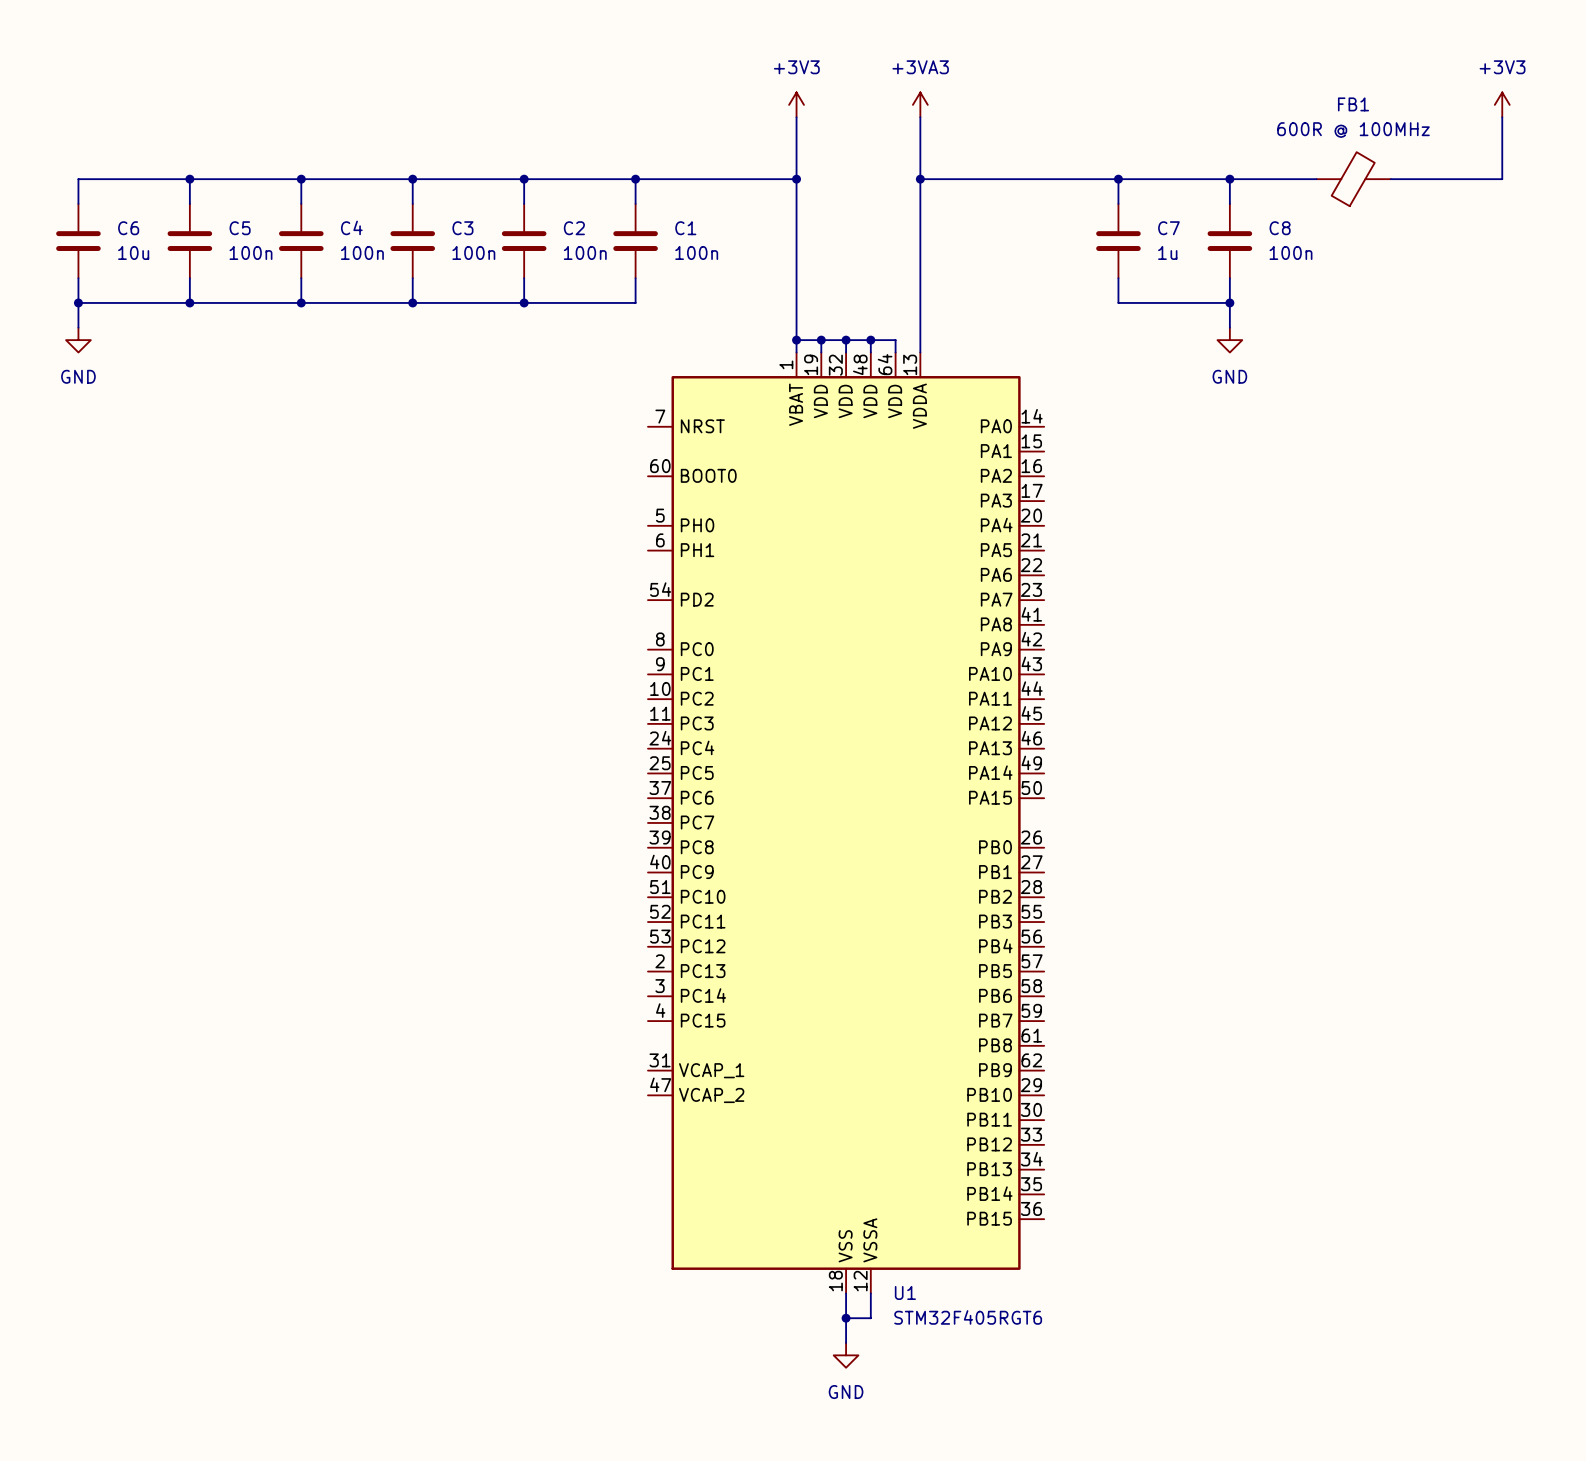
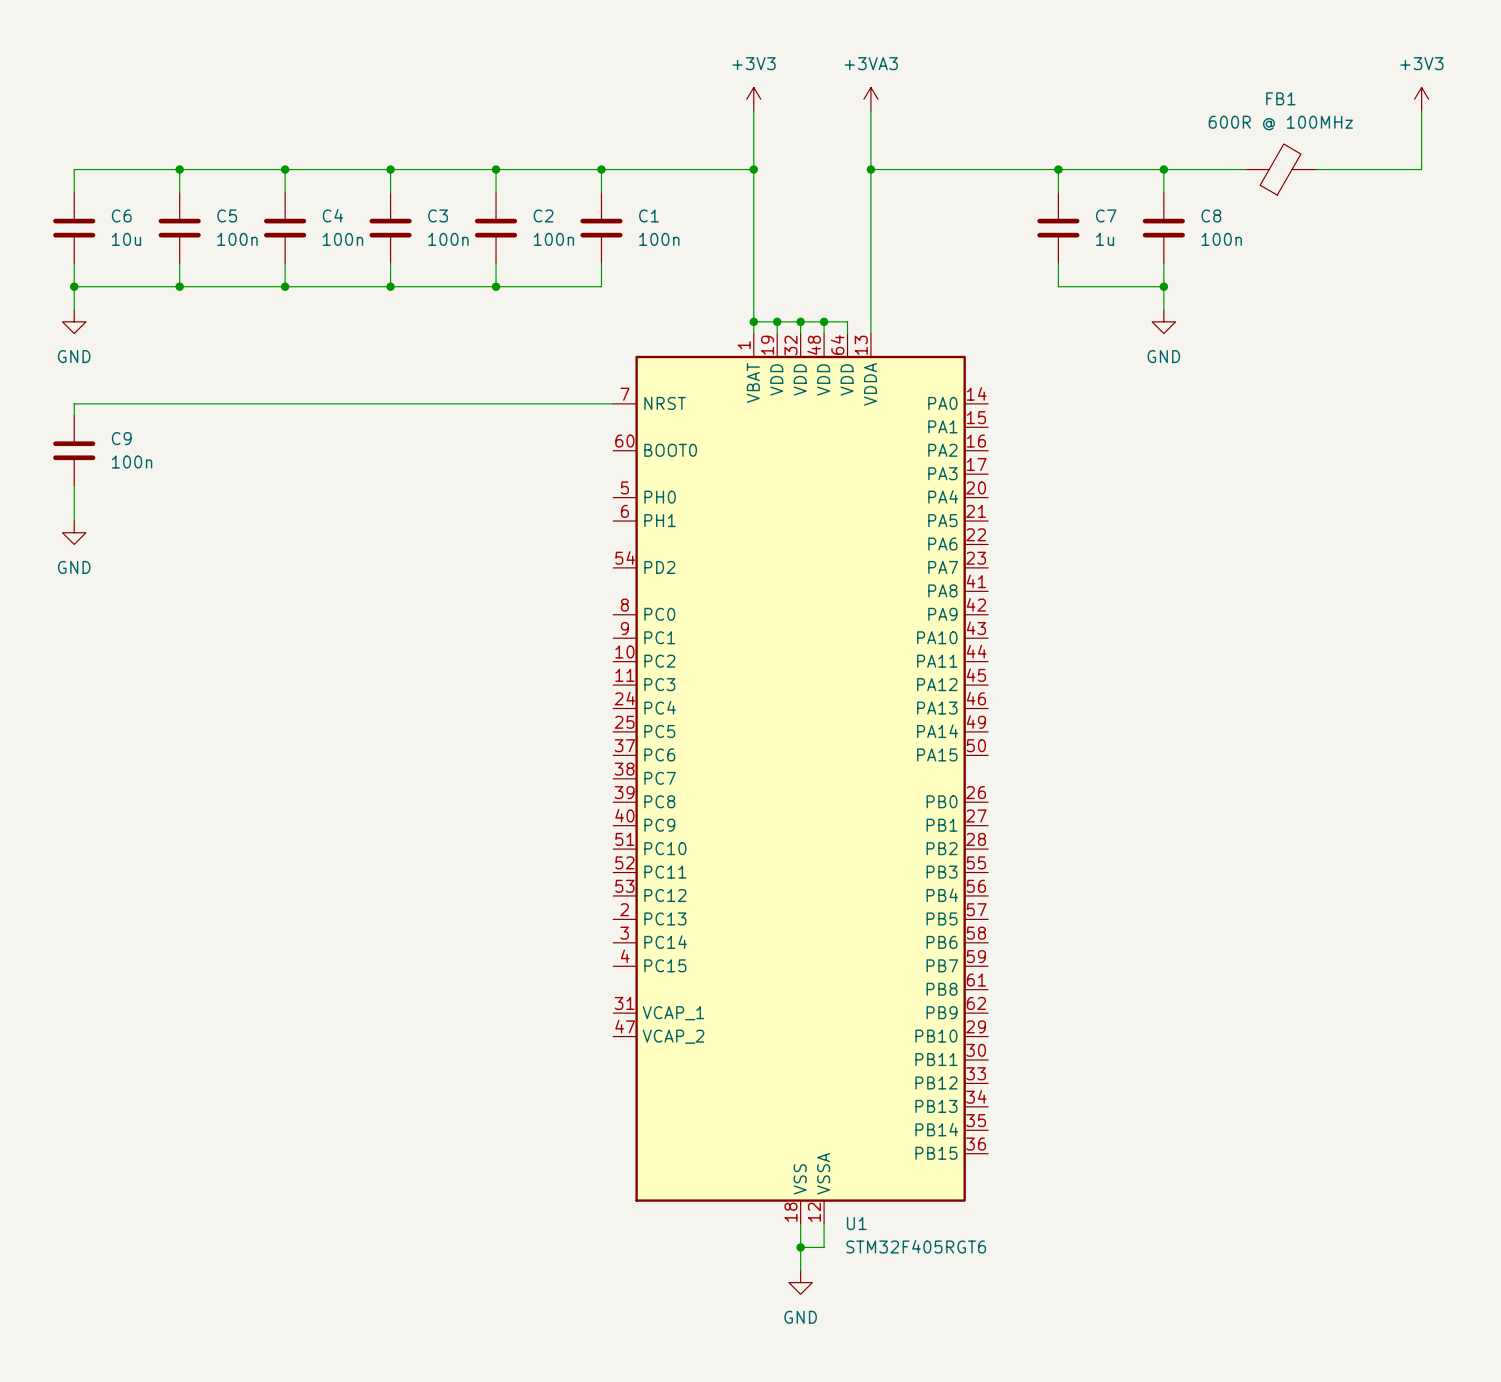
wire: none -> (613, 403) (74, 403) (74, 415)
C9: none -> 100n (74, 450)
wire: none -> (74, 485) (74, 521)
power symbol: none -> GND (74, 532)

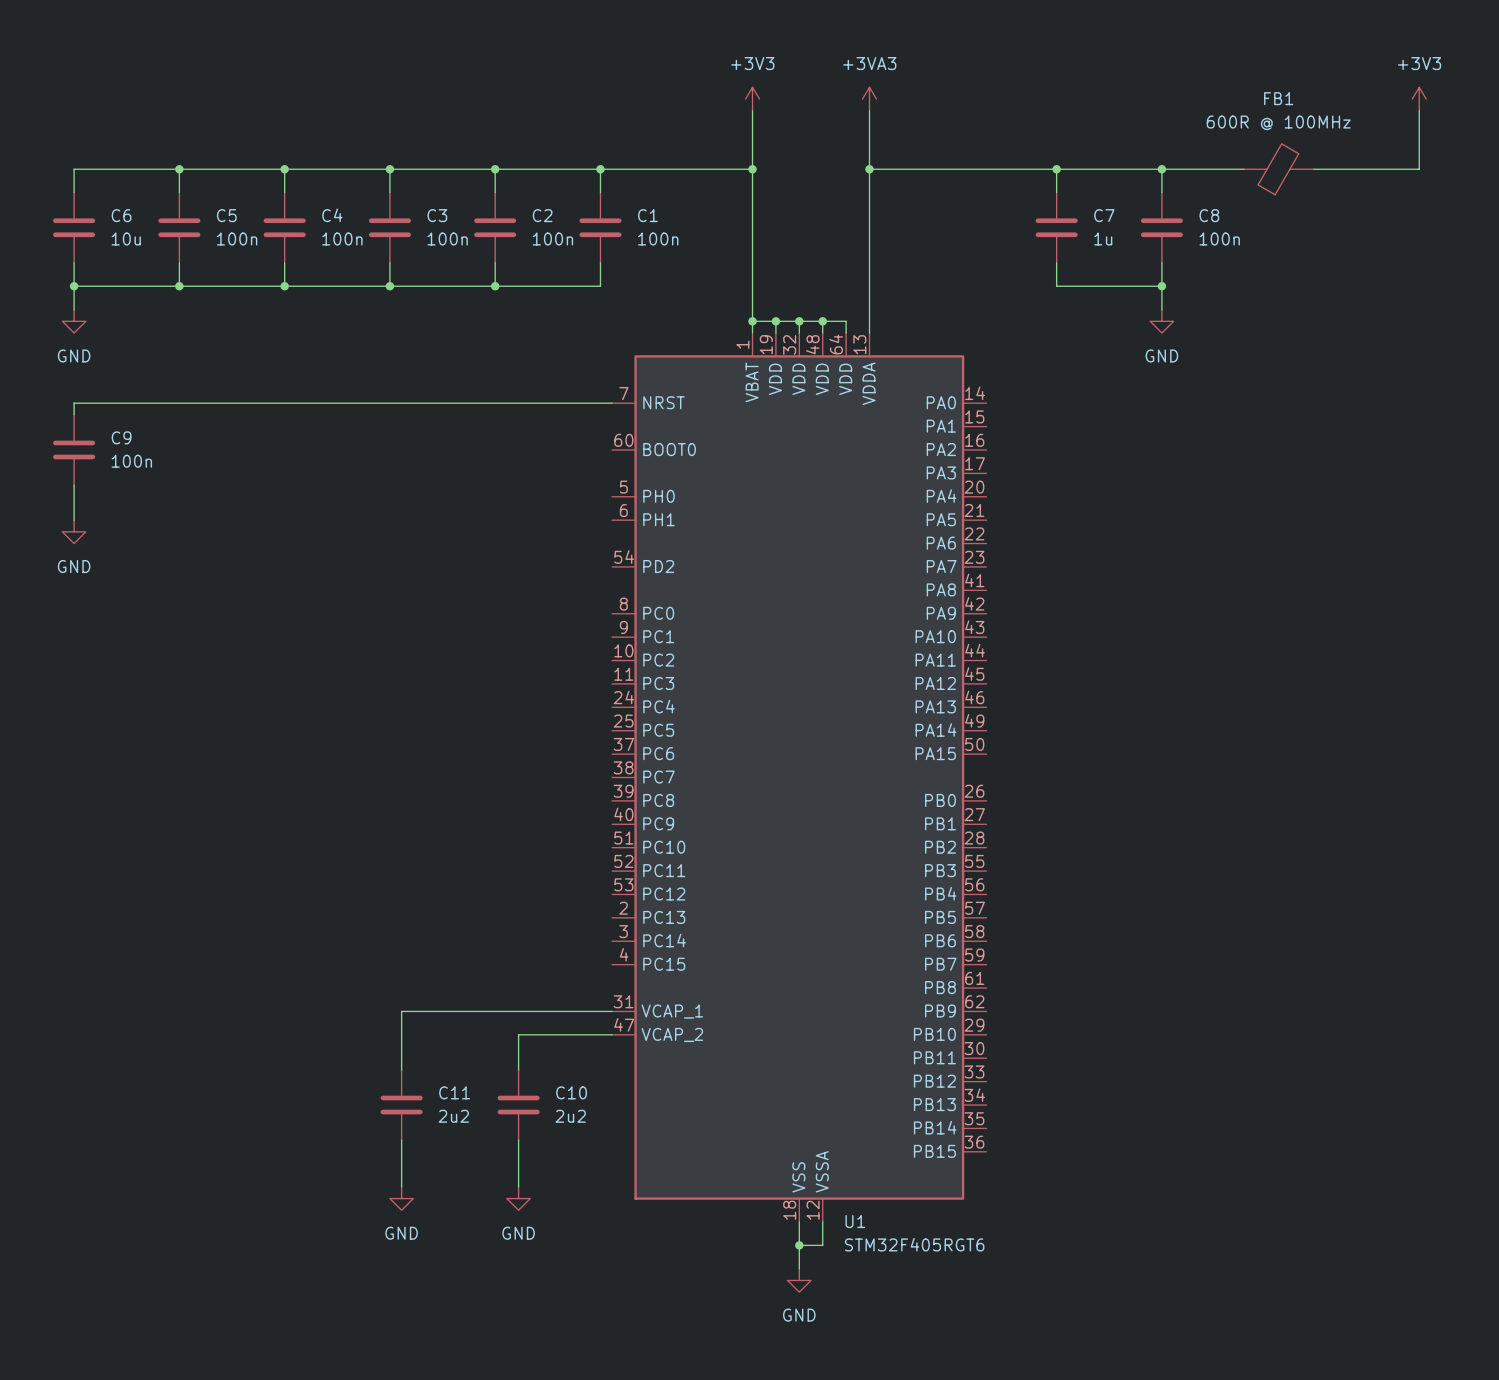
wire: none -> (612, 1011) (401, 1011) (401, 1069)
wire: none -> (612, 1034) (518, 1034) (518, 1069)
C11: none -> 2u2 (401, 1105)
C10: none -> 2u2 (518, 1105)
wire: none -> (401, 1140) (401, 1186)
wire: none -> (518, 1140) (518, 1186)
power symbol: none -> GND (401, 1198)
power symbol: none -> GND (518, 1198)

